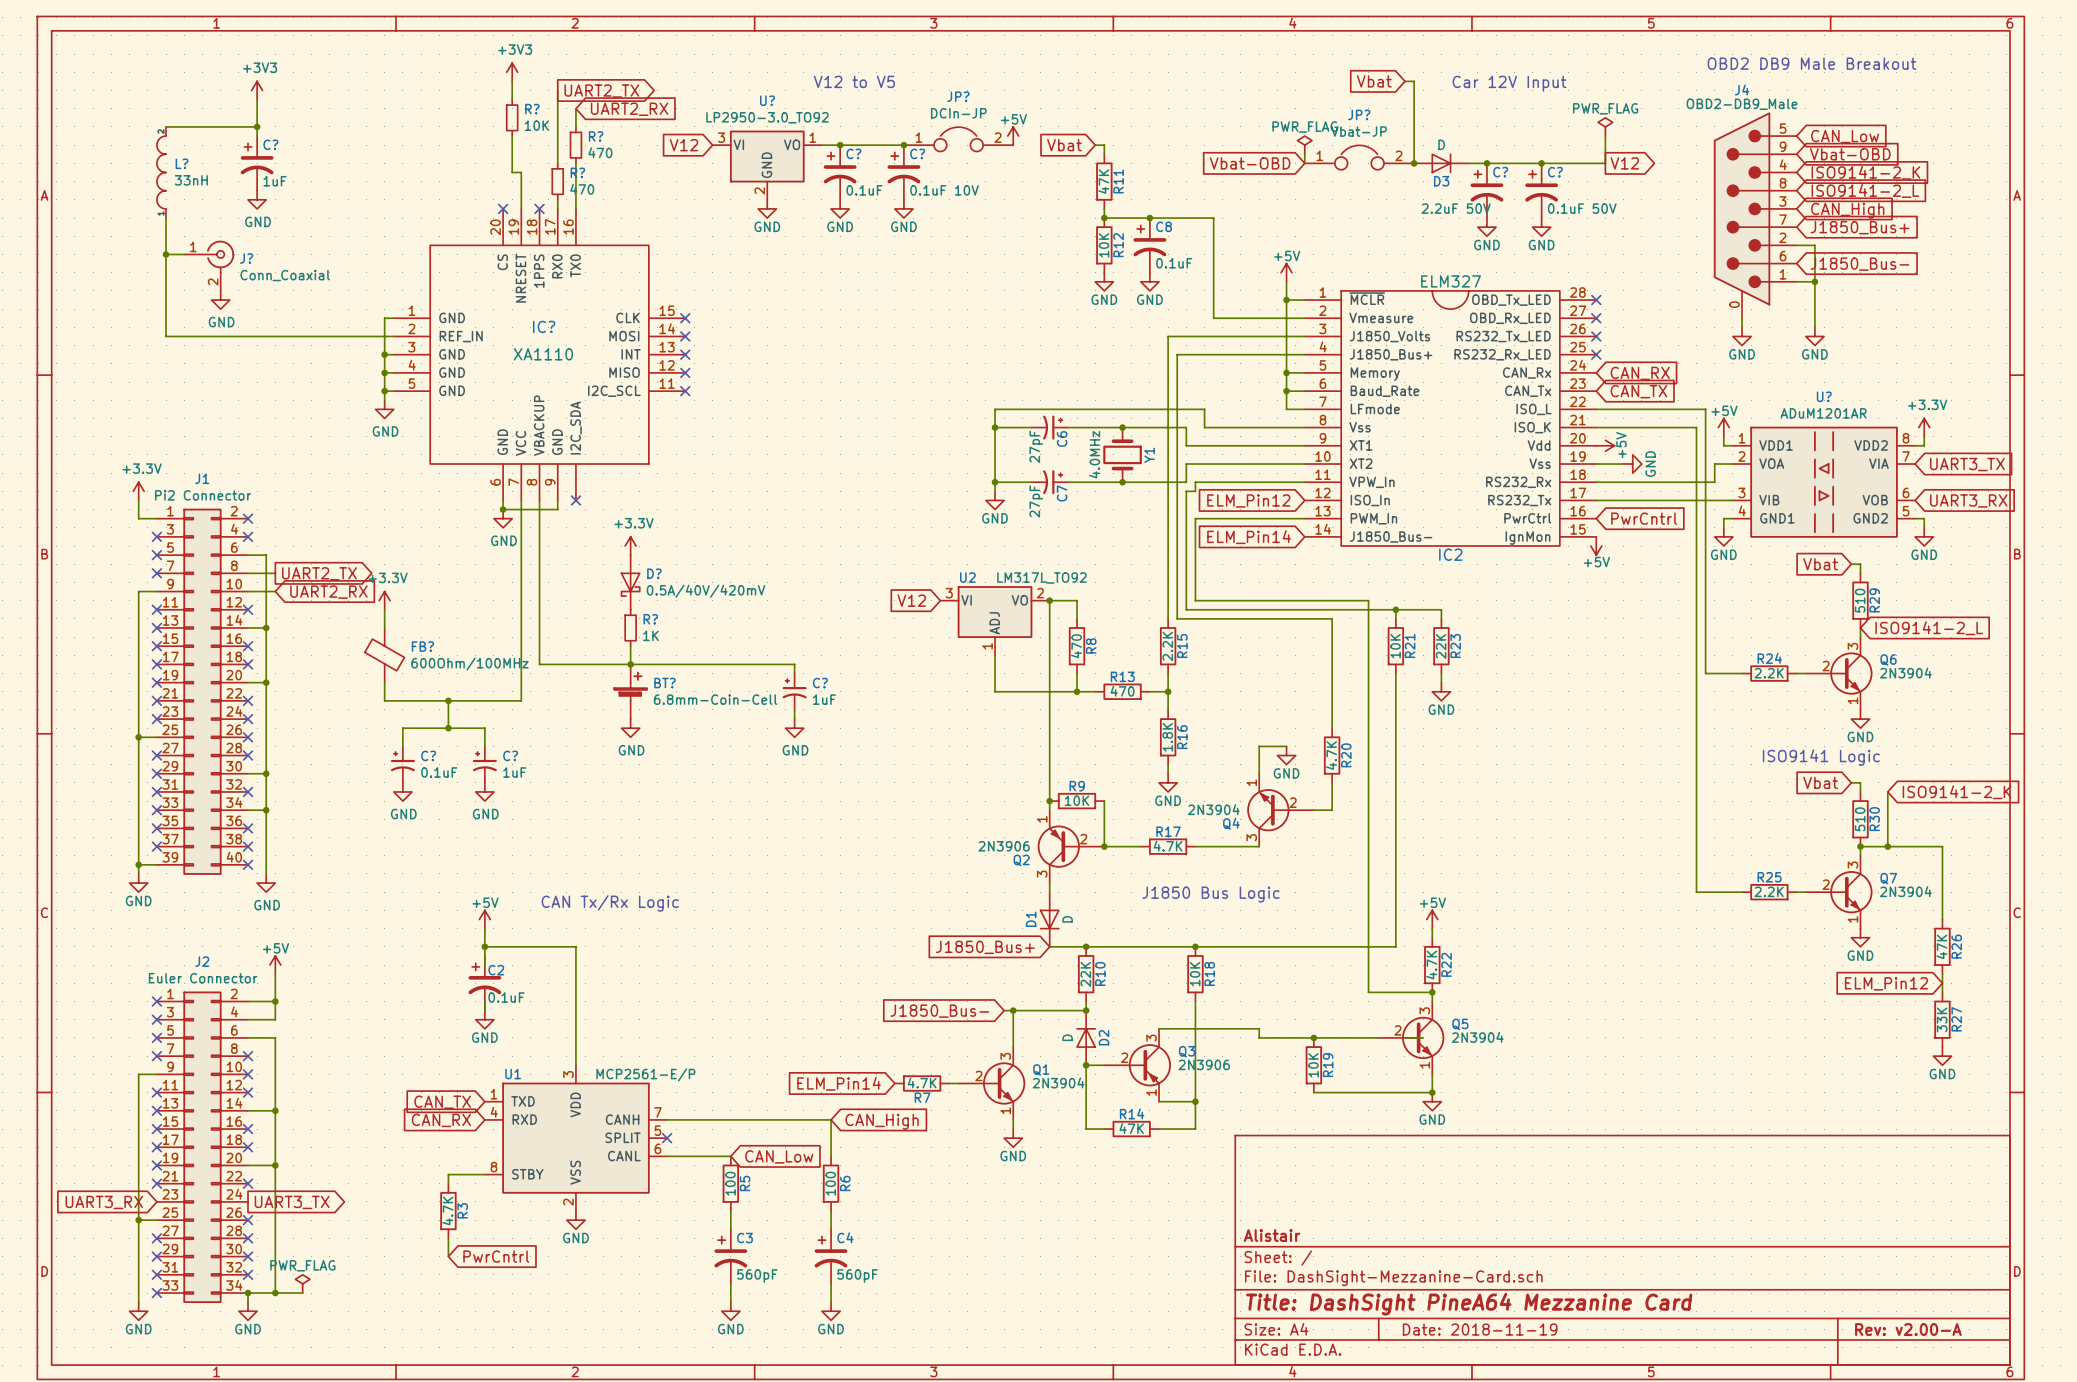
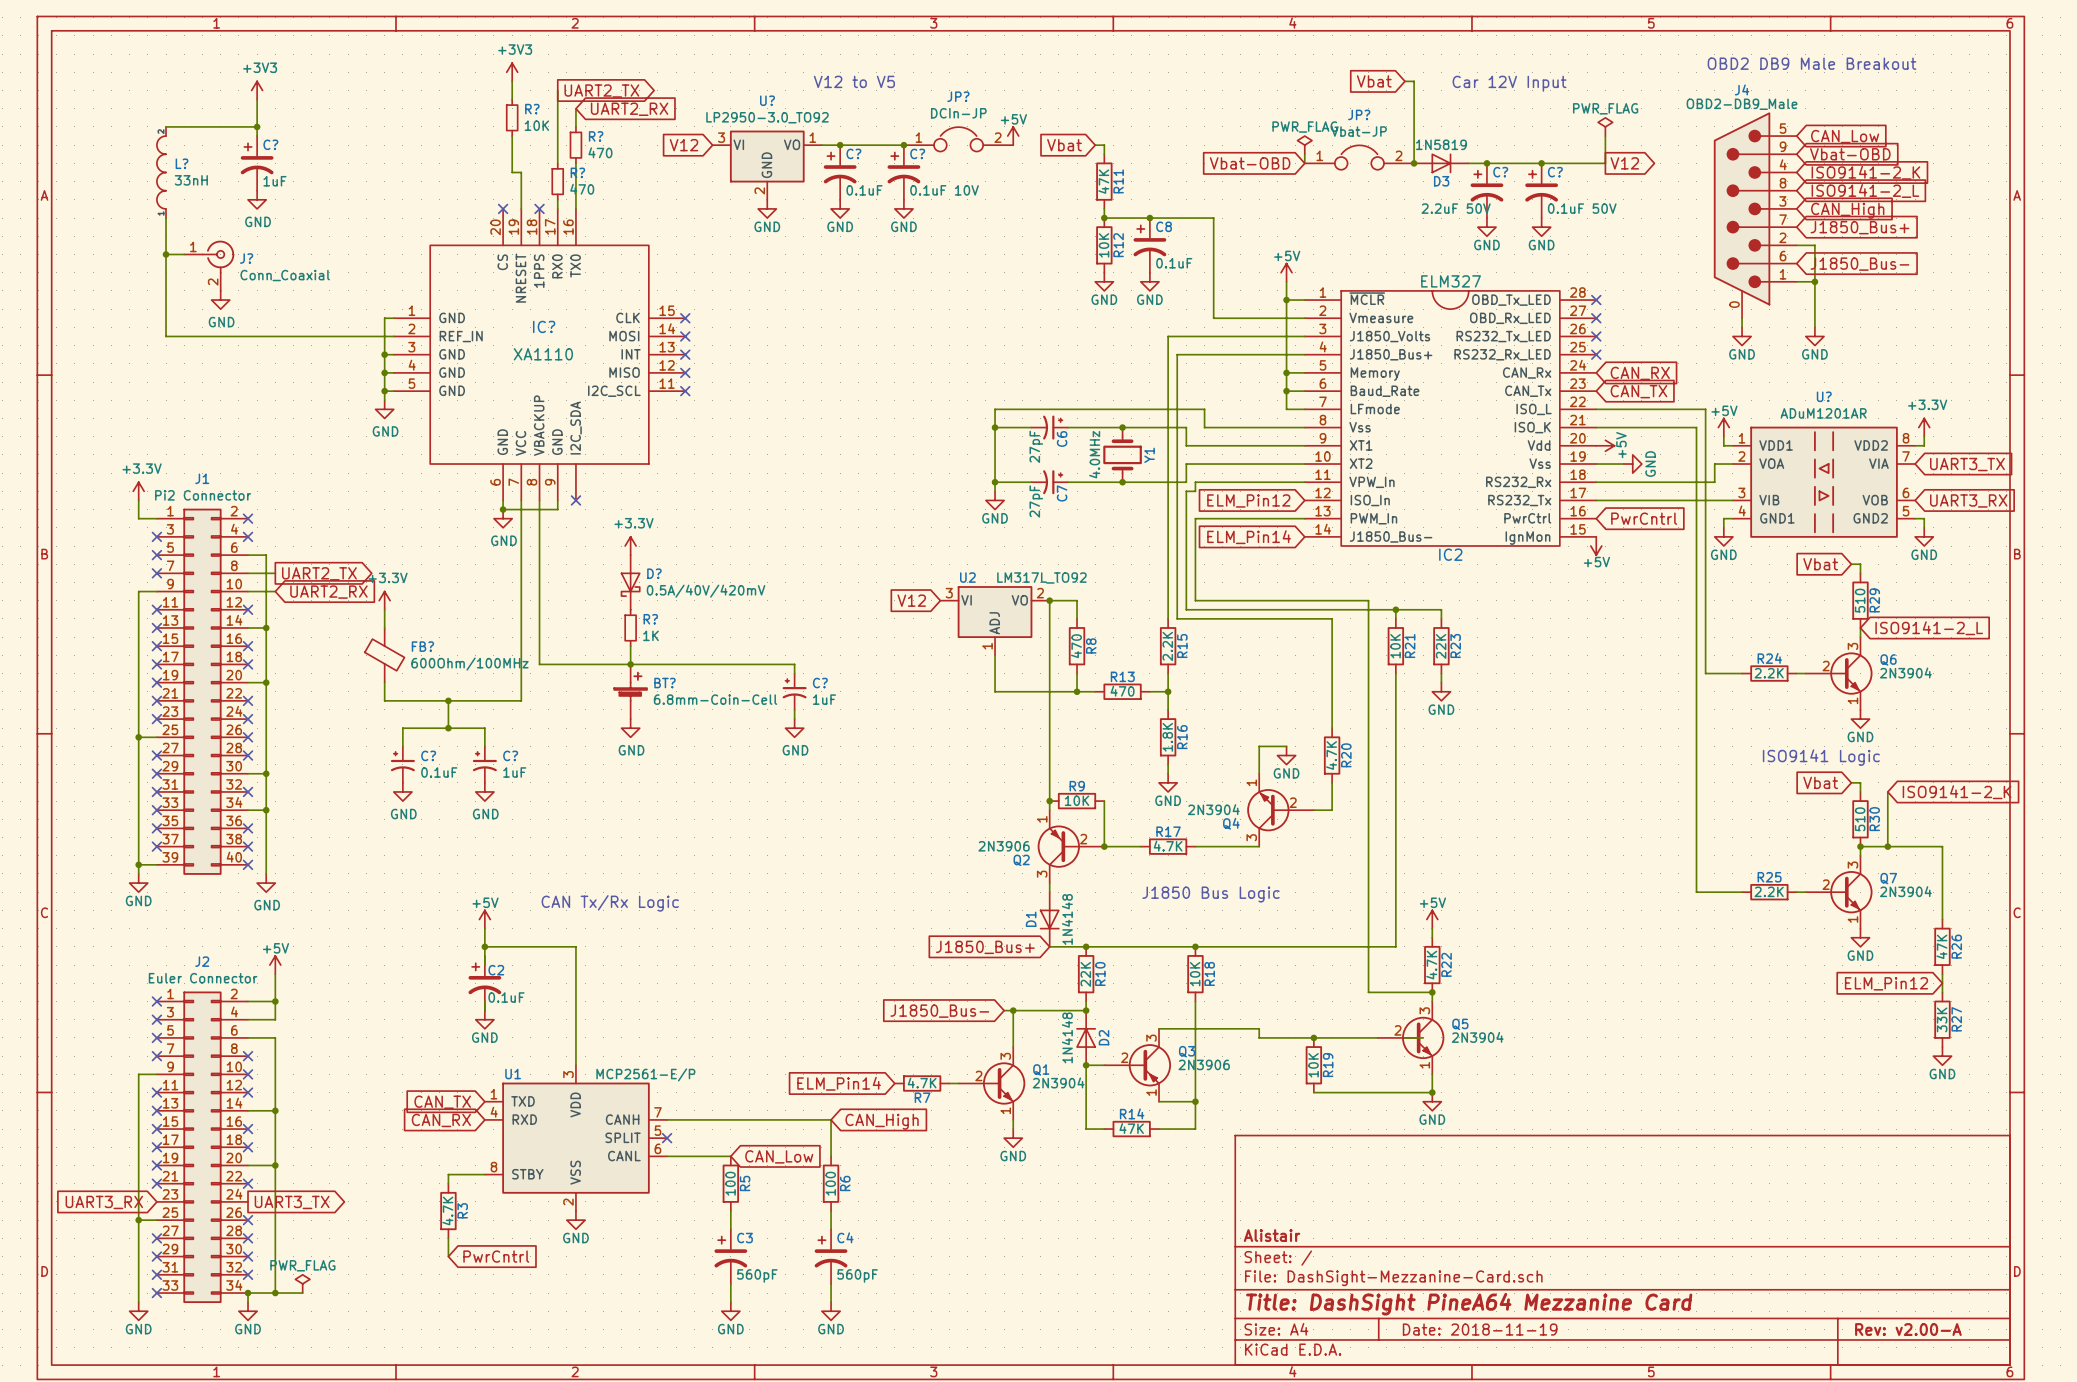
D3 value: D (1441, 144) -> 1N5819 (1441, 144)
D1 value: D (1067, 919) -> 1N4148 (1067, 919)
D2 value: D (1067, 1037) -> 1N4148 (1067, 1037)

